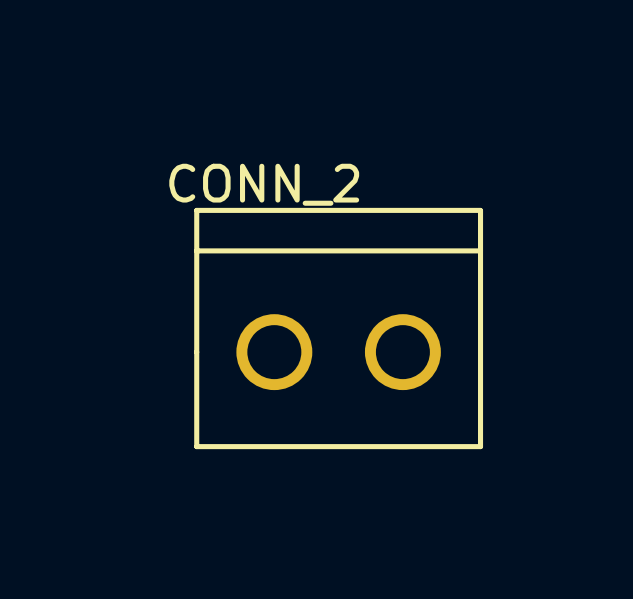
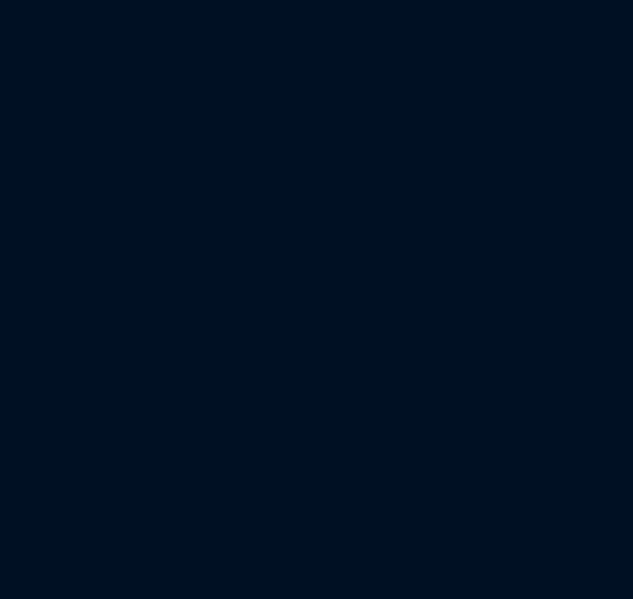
part: CONN_2 (338, 328) -> none

